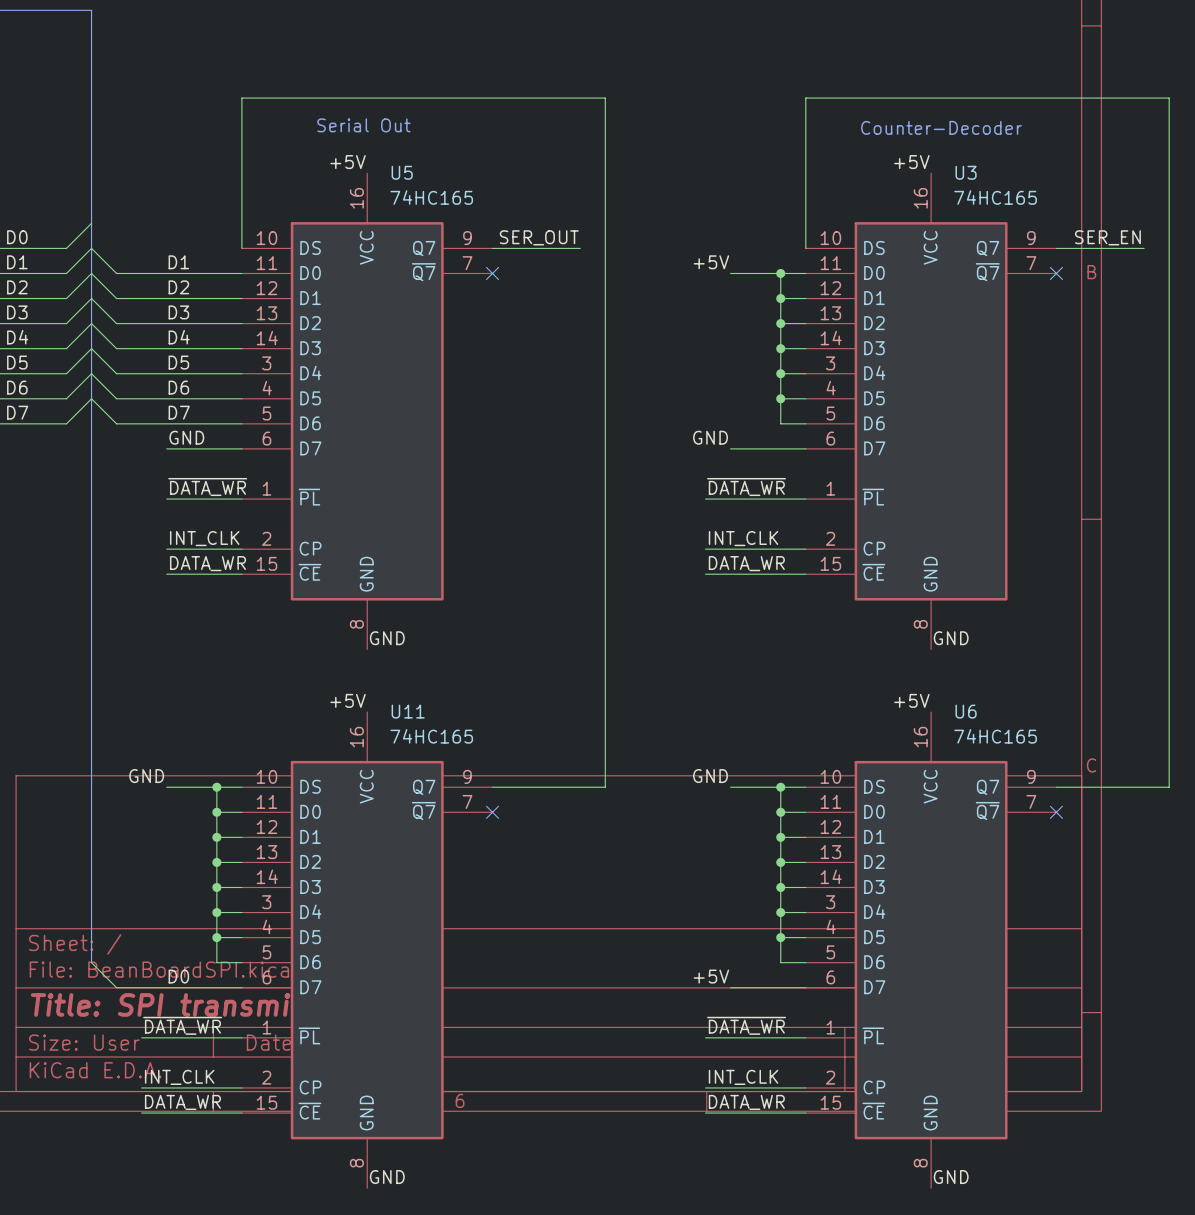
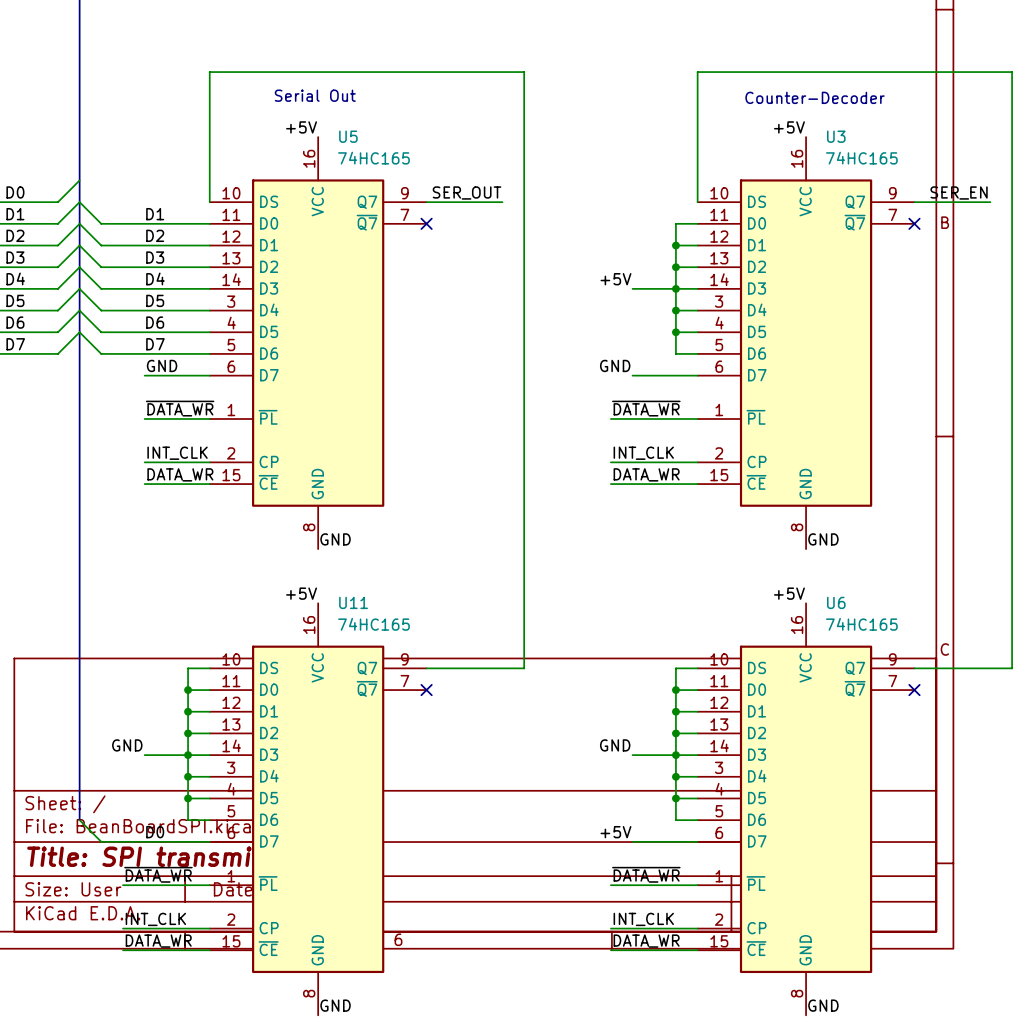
label position: +5V (711, 262) -> +5V (615, 279)
wire: (730, 273) (780, 273) -> (632, 288) (675, 288)
junction: (780, 273) -> none
label position: GND (146, 776) -> GND (127, 745)
label position: GND (710, 776) -> GND (615, 745)
wire: (166, 787) (216, 787) -> (144, 755) (188, 755)
junction: (216, 787) -> none
wire: (730, 787) (780, 787) -> (632, 755) (675, 755)
junction: (780, 787) -> none

